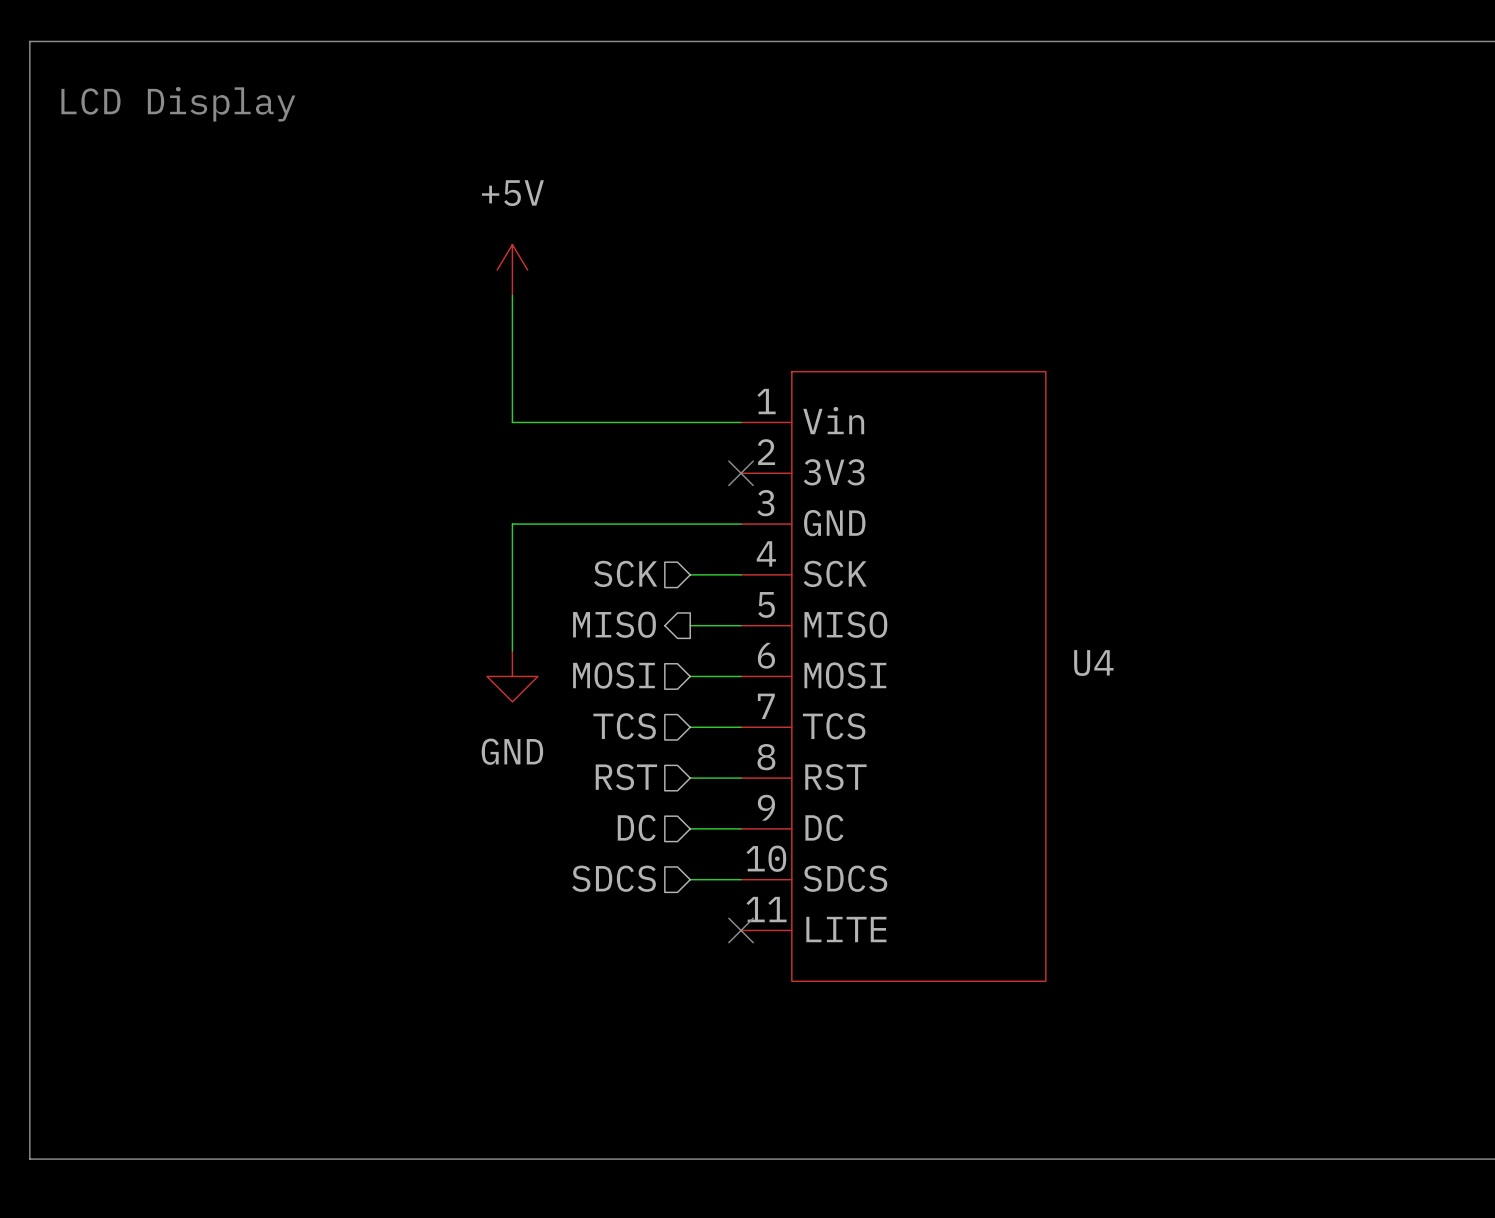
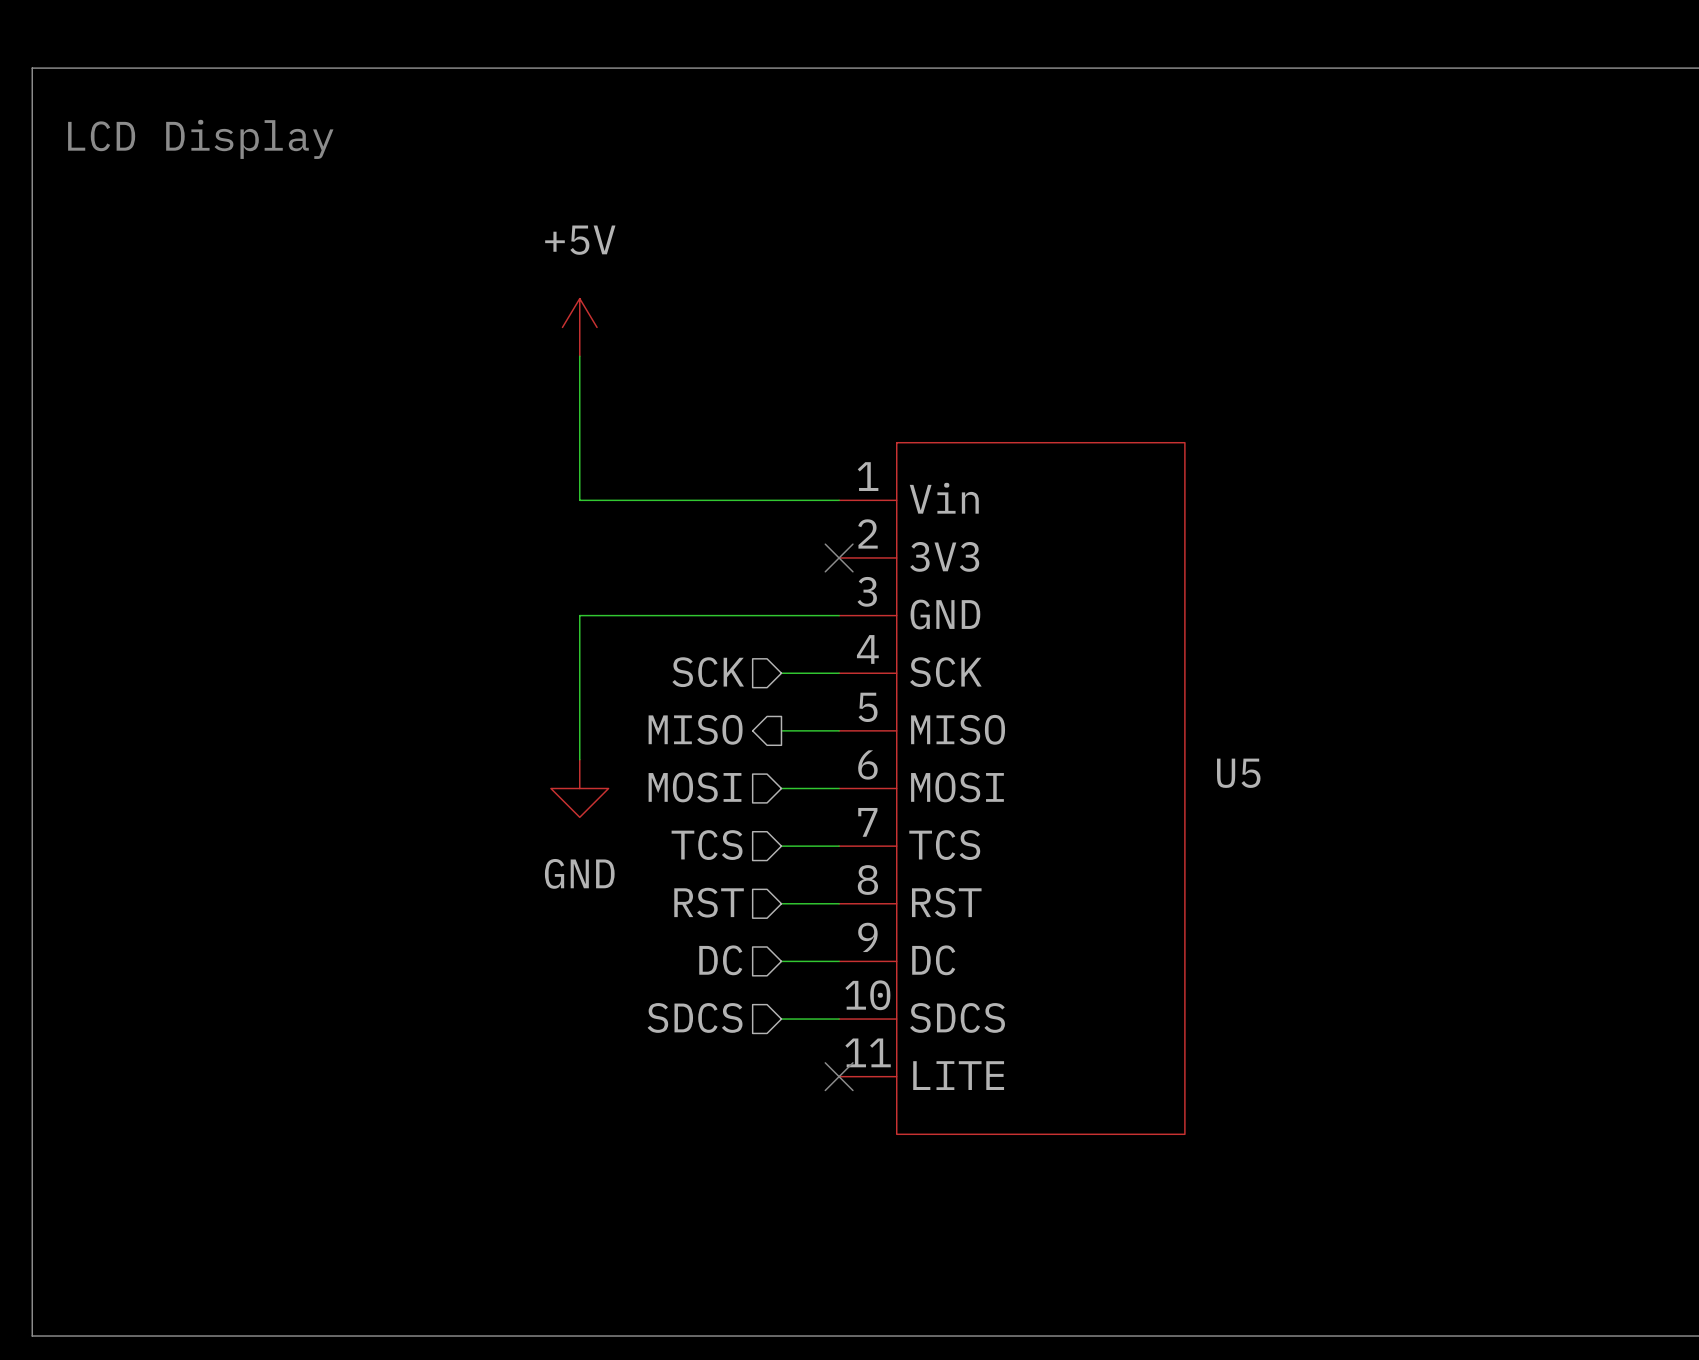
U4 name: U4 (1093, 663) -> U5 (1238, 773)

